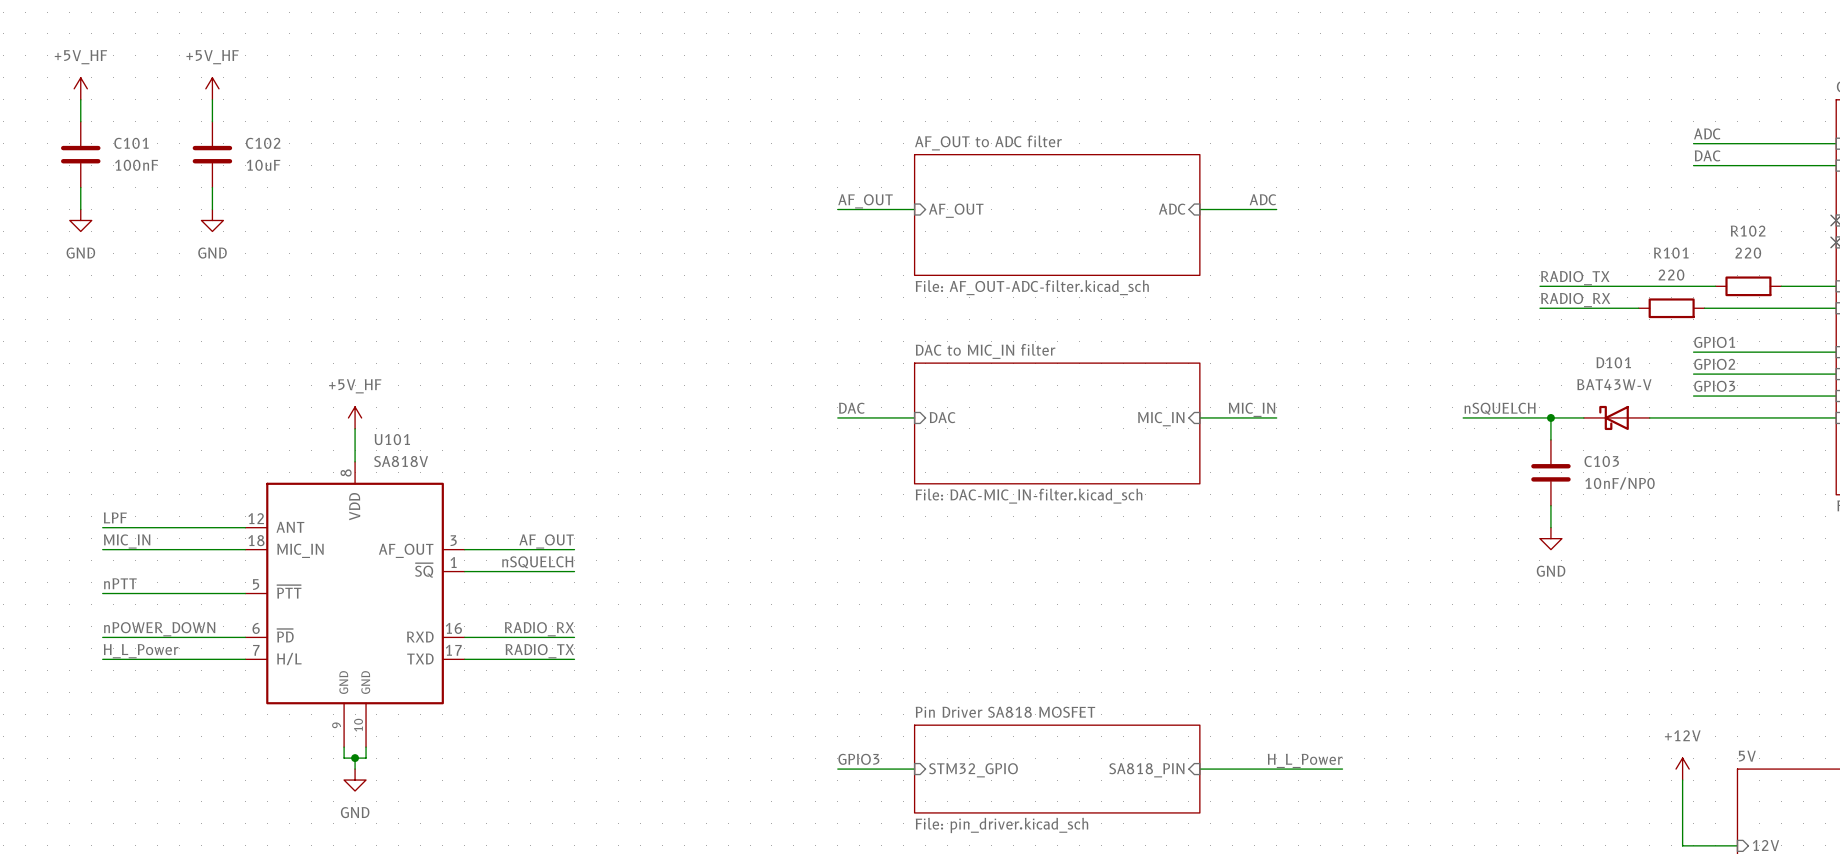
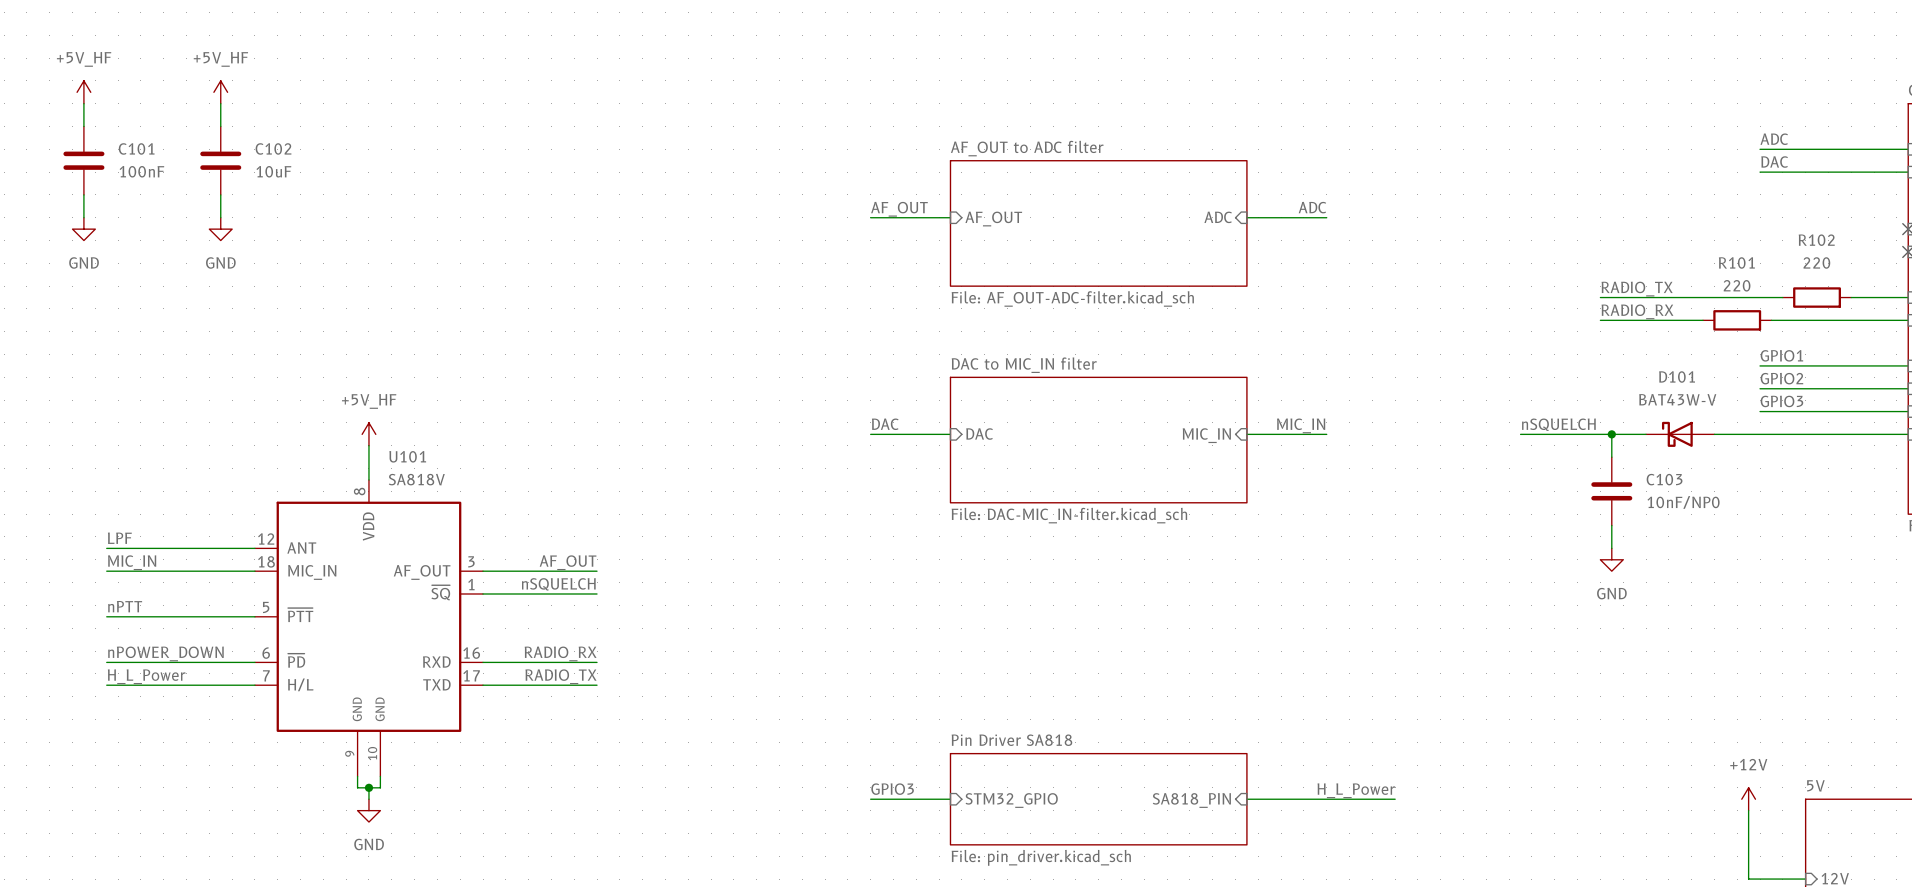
sheet Pin Driver SA818 MOSFET name: Pin Driver SA818 MOSFET (1005, 712) -> Pin Driver SA818 (1011, 740)

